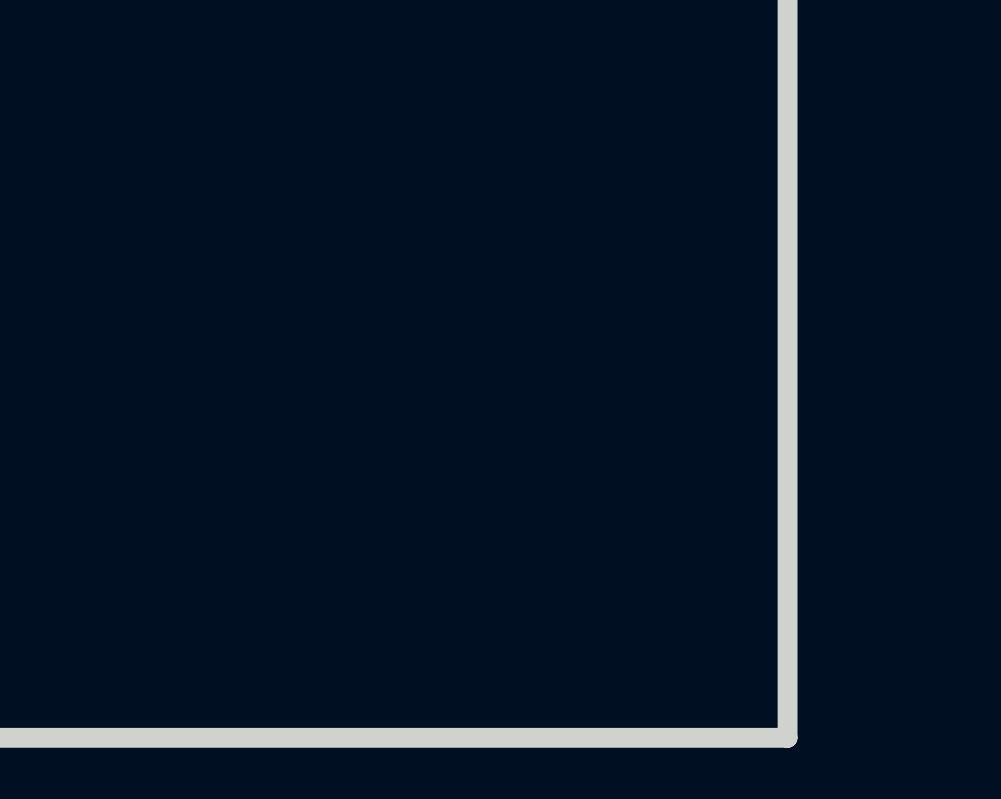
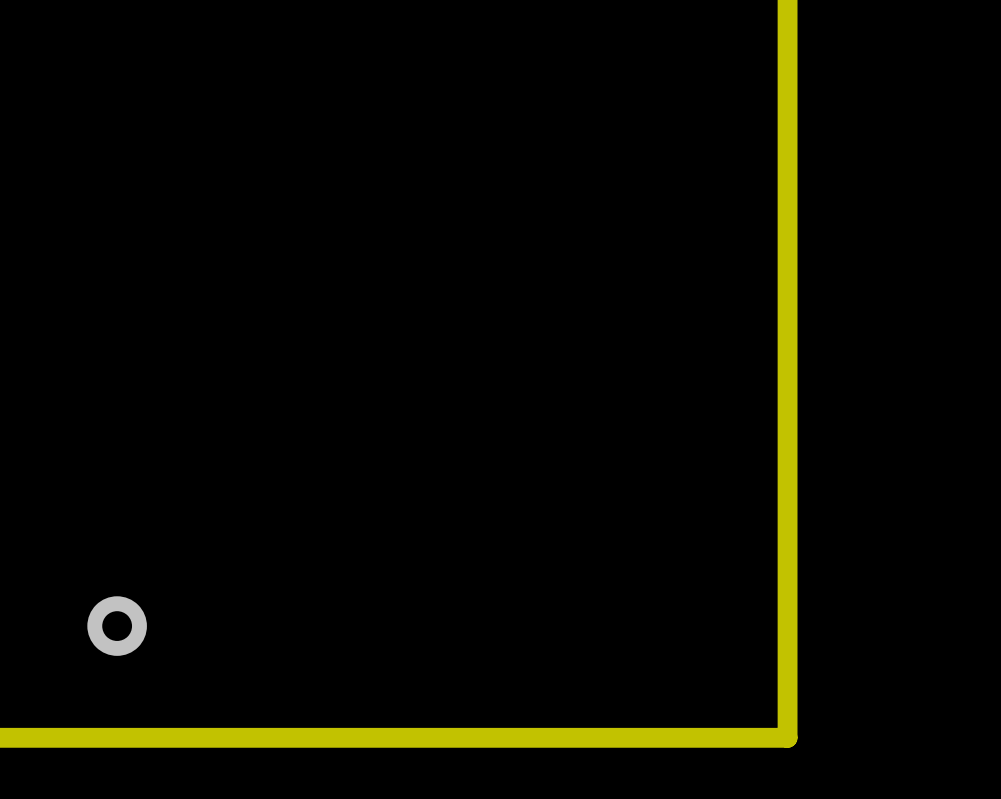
via: none -> (117, 626)

